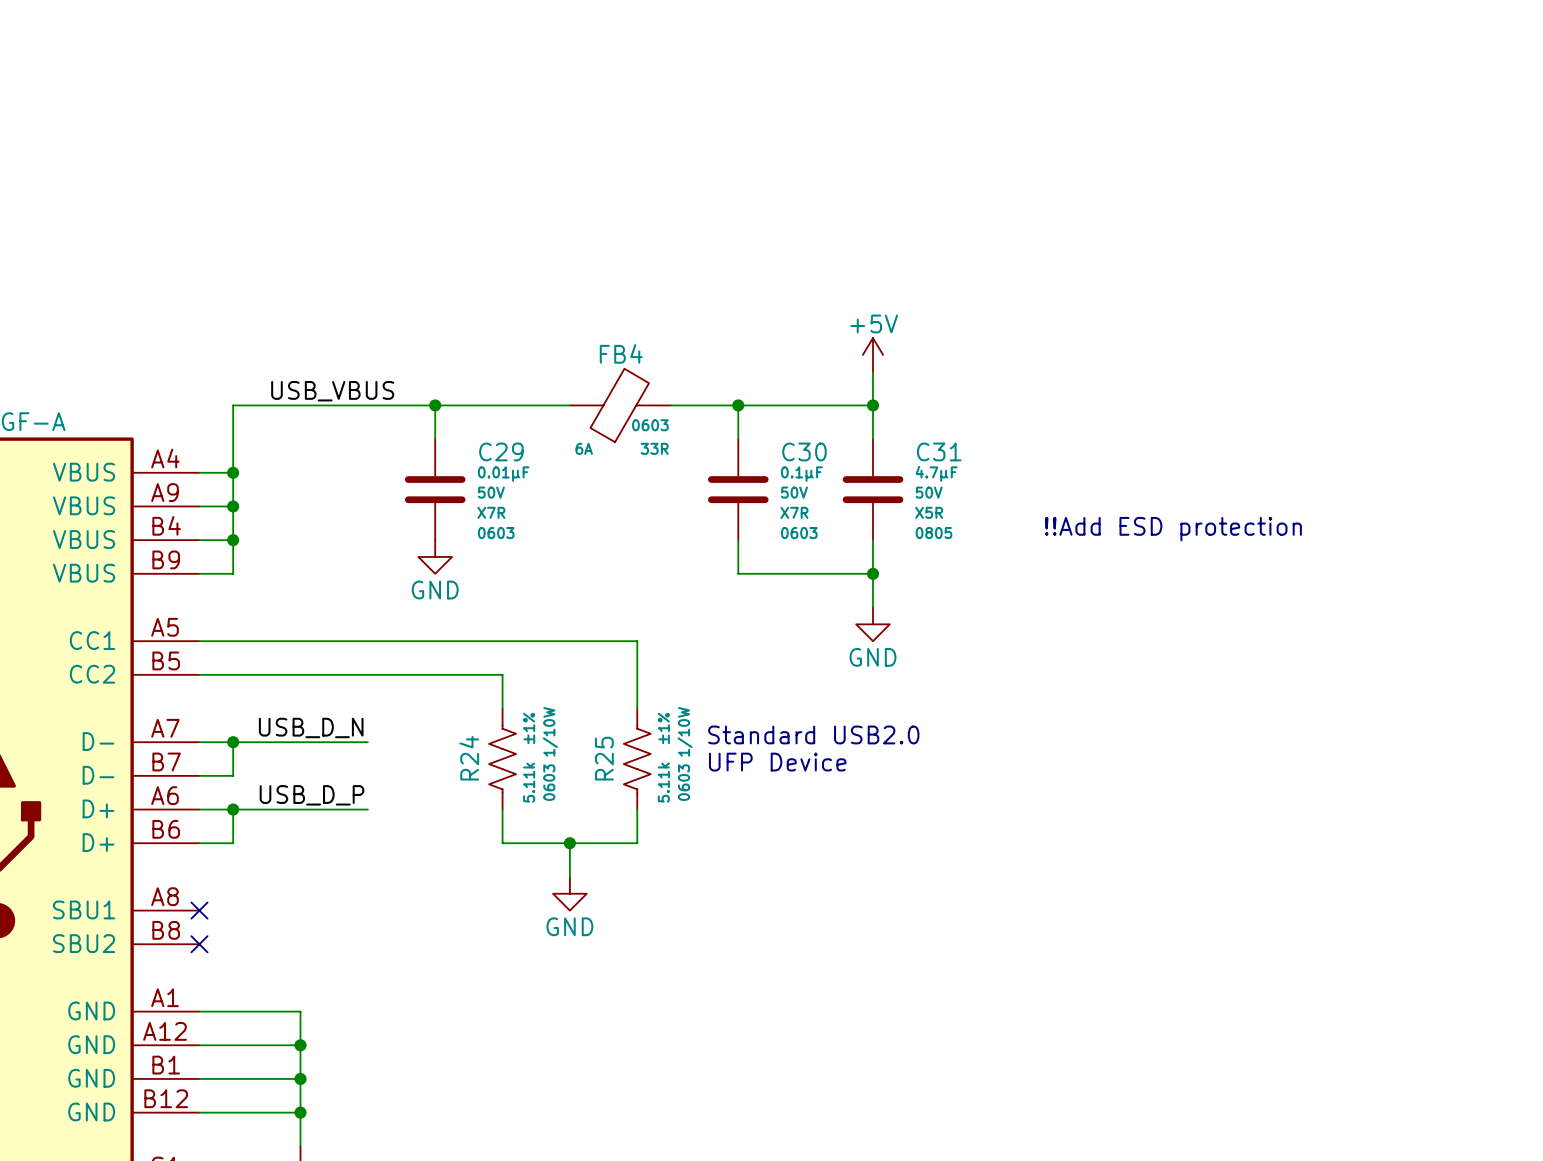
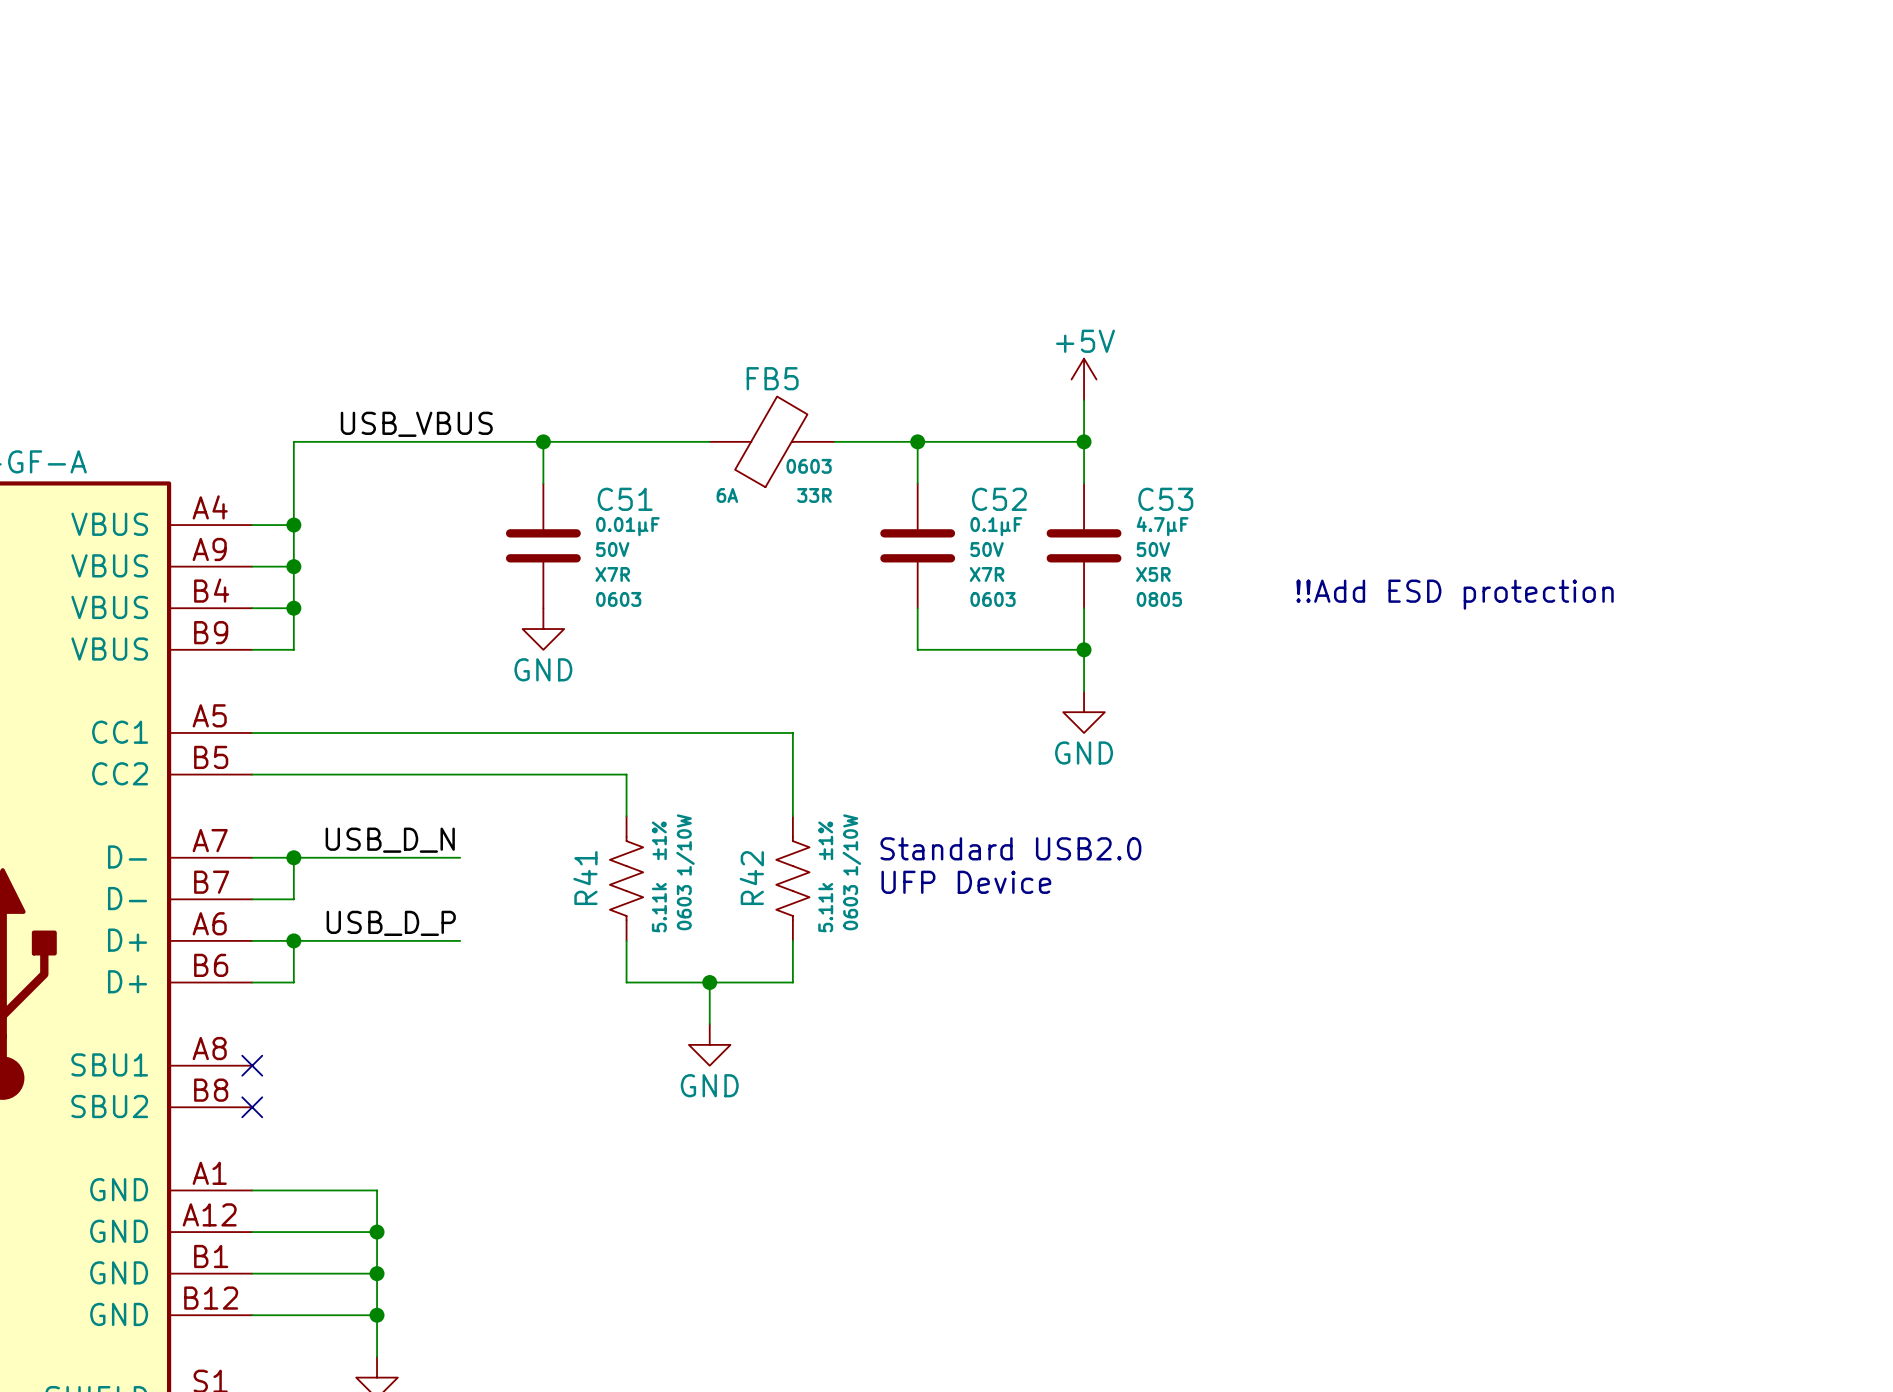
FB4 name: FB4 (621, 353) -> FB5 (772, 378)
C29 name: C29 (501, 451) -> C51 (625, 499)
C30 name: C30 (804, 451) -> C52 (999, 499)
C31 name: C31 (939, 451) -> C53 (1165, 499)
R24 name: R24 (469, 758) -> R41 (585, 878)
R25 name: R25 (604, 758) -> R42 (751, 878)

